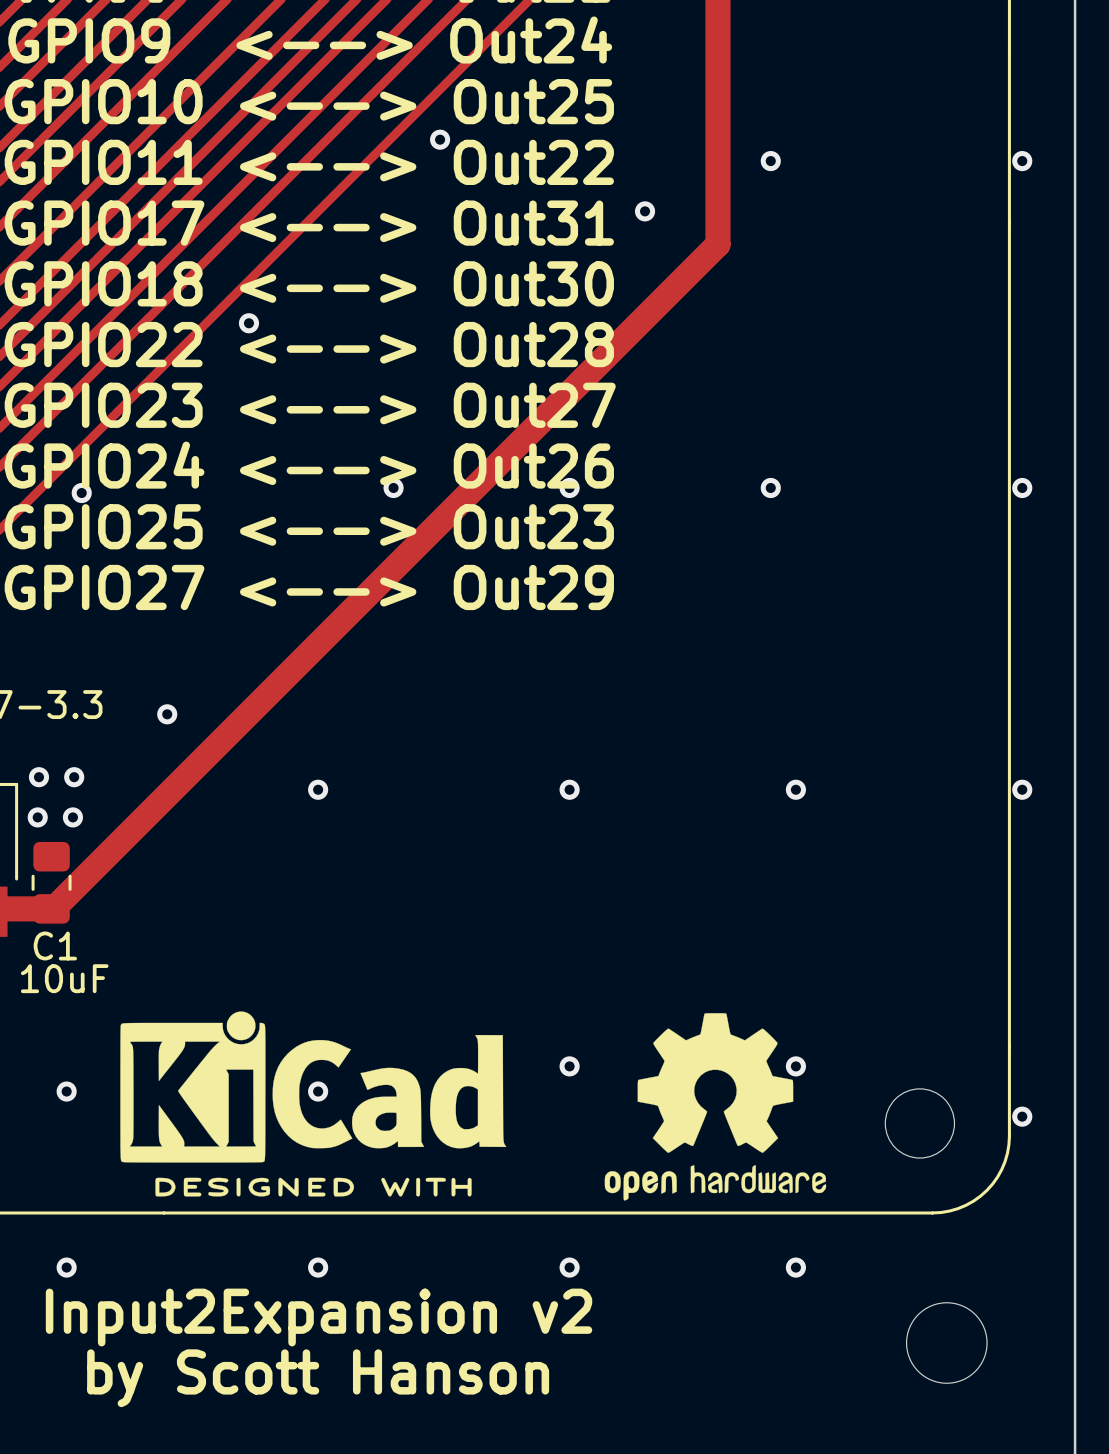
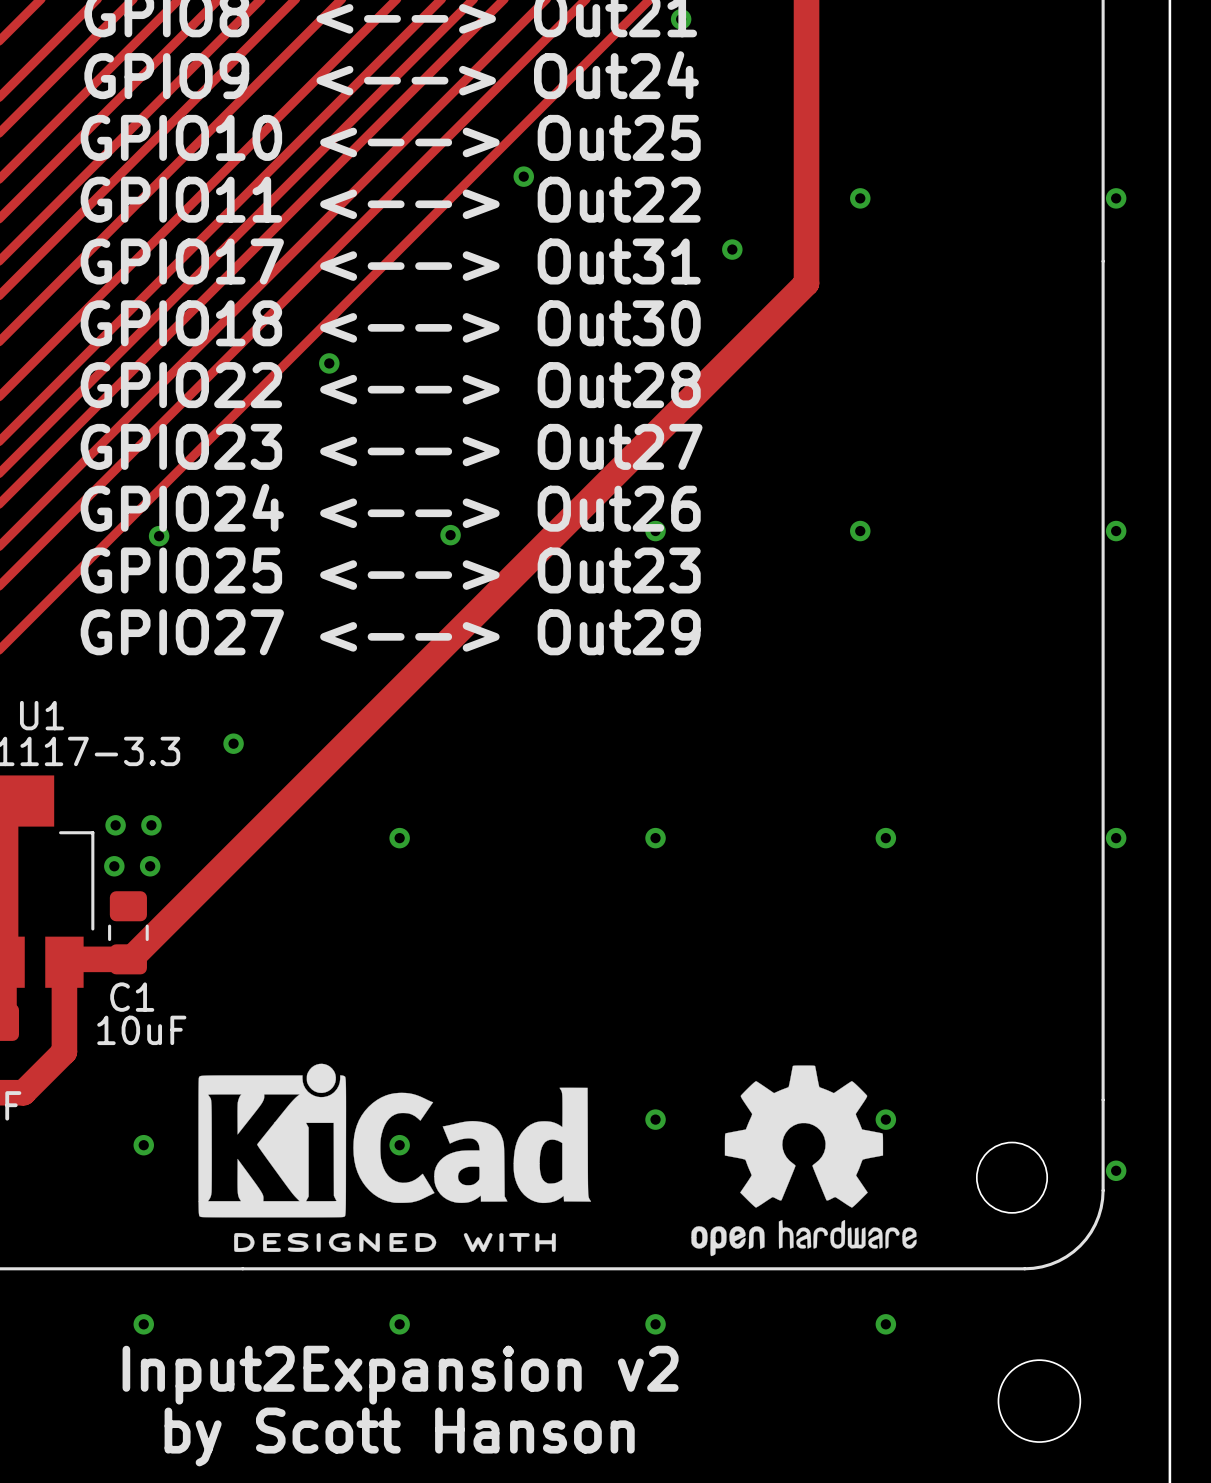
via position: (393, 487) -> (450, 535)
via position: (167, 714) -> (233, 743)

